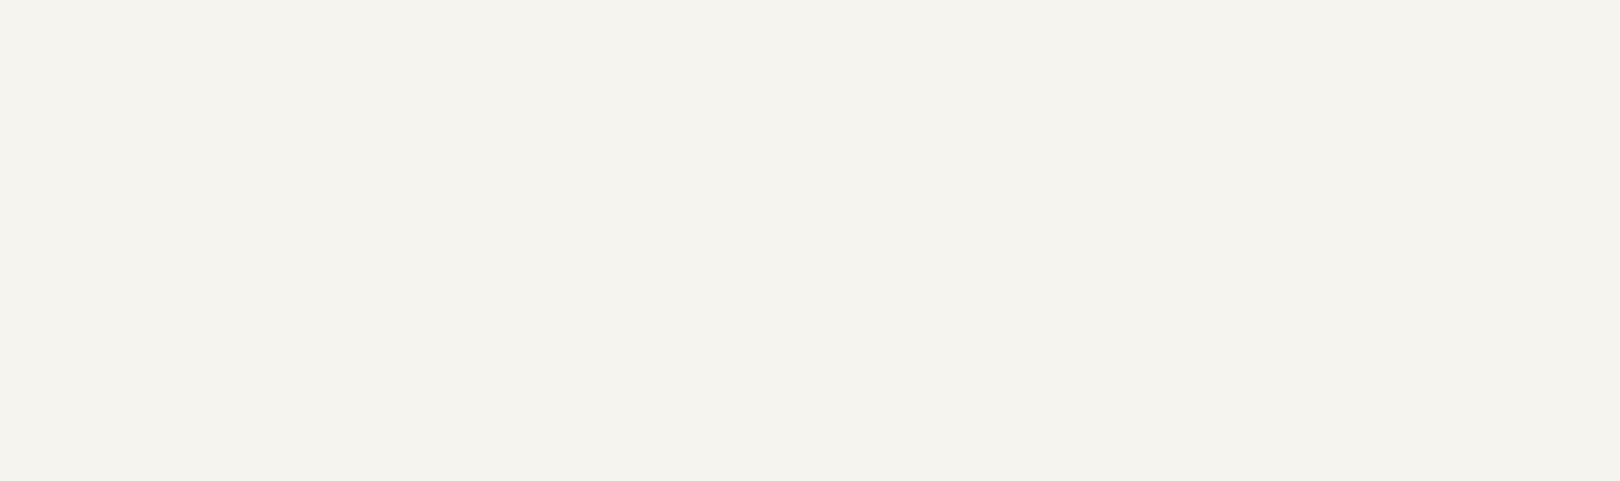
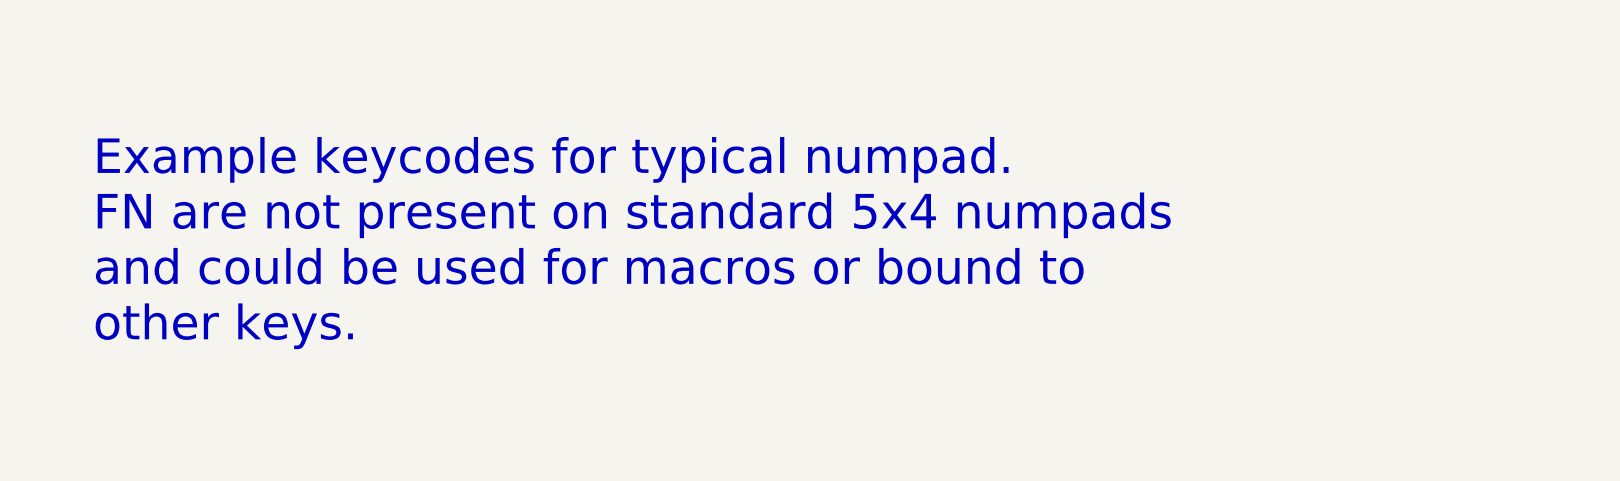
text: none -> Example keycodes for typical numpad. (553, 159)
text: none -> FN are not present on standard 5x4 numpads (634, 215)
text: none -> and could be used for macros or bound to (589, 266)
text: none -> other keys. (224, 326)

